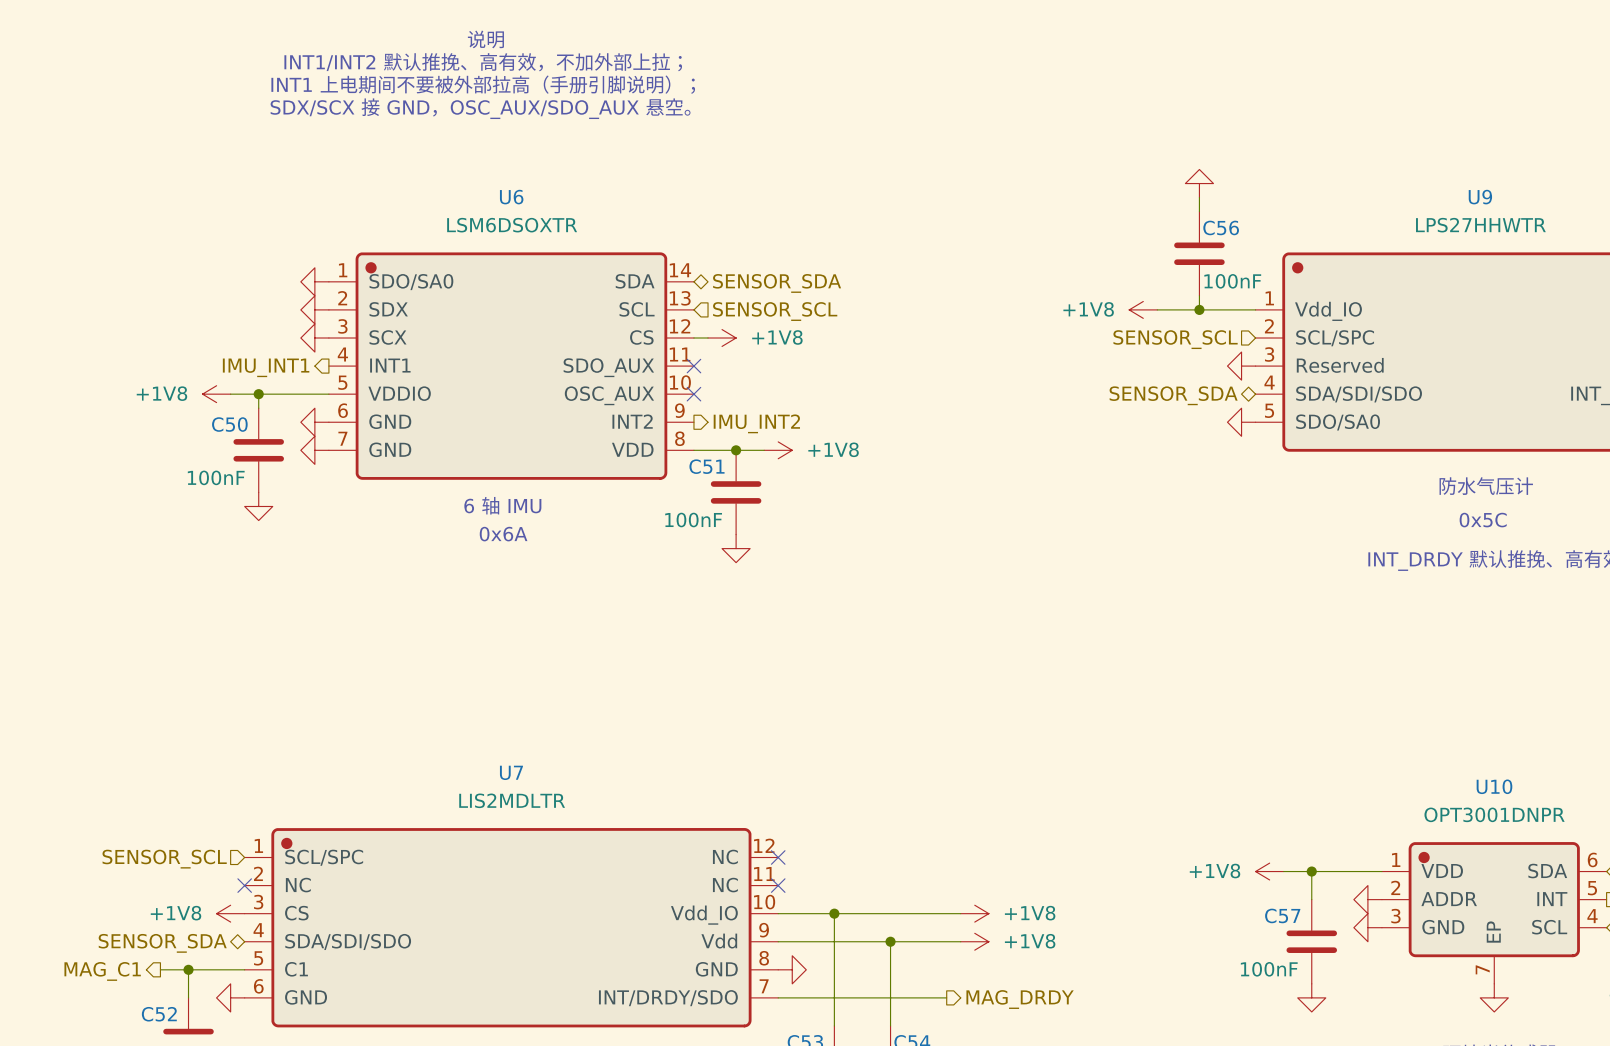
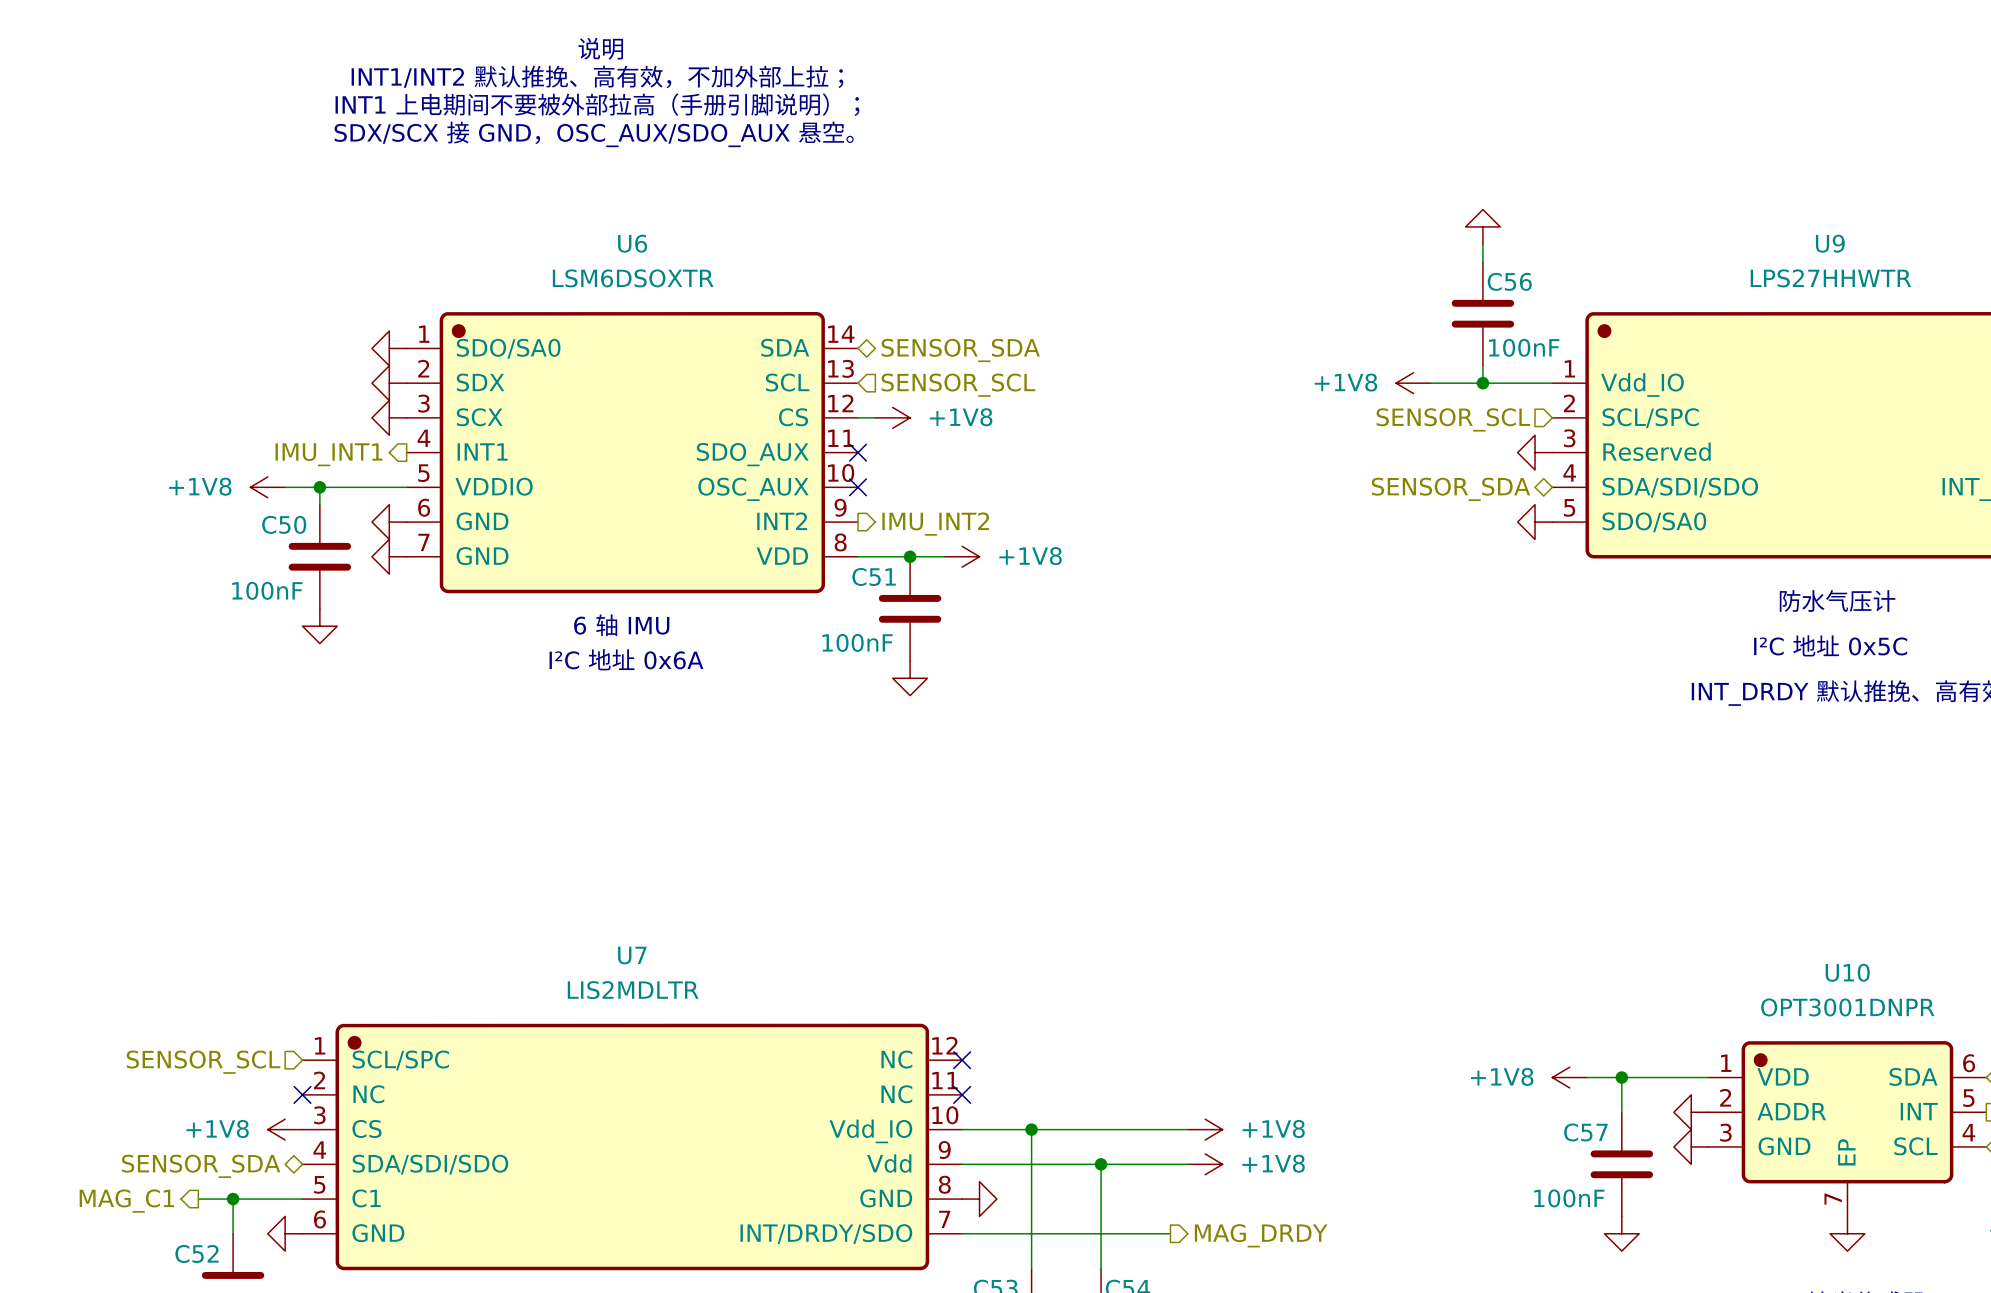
text: 0x5C (1483, 520) -> I²C 地址 0x5C (1830, 645)
text: 0x6A (503, 534) -> I²C 地址 0x6A (626, 659)

